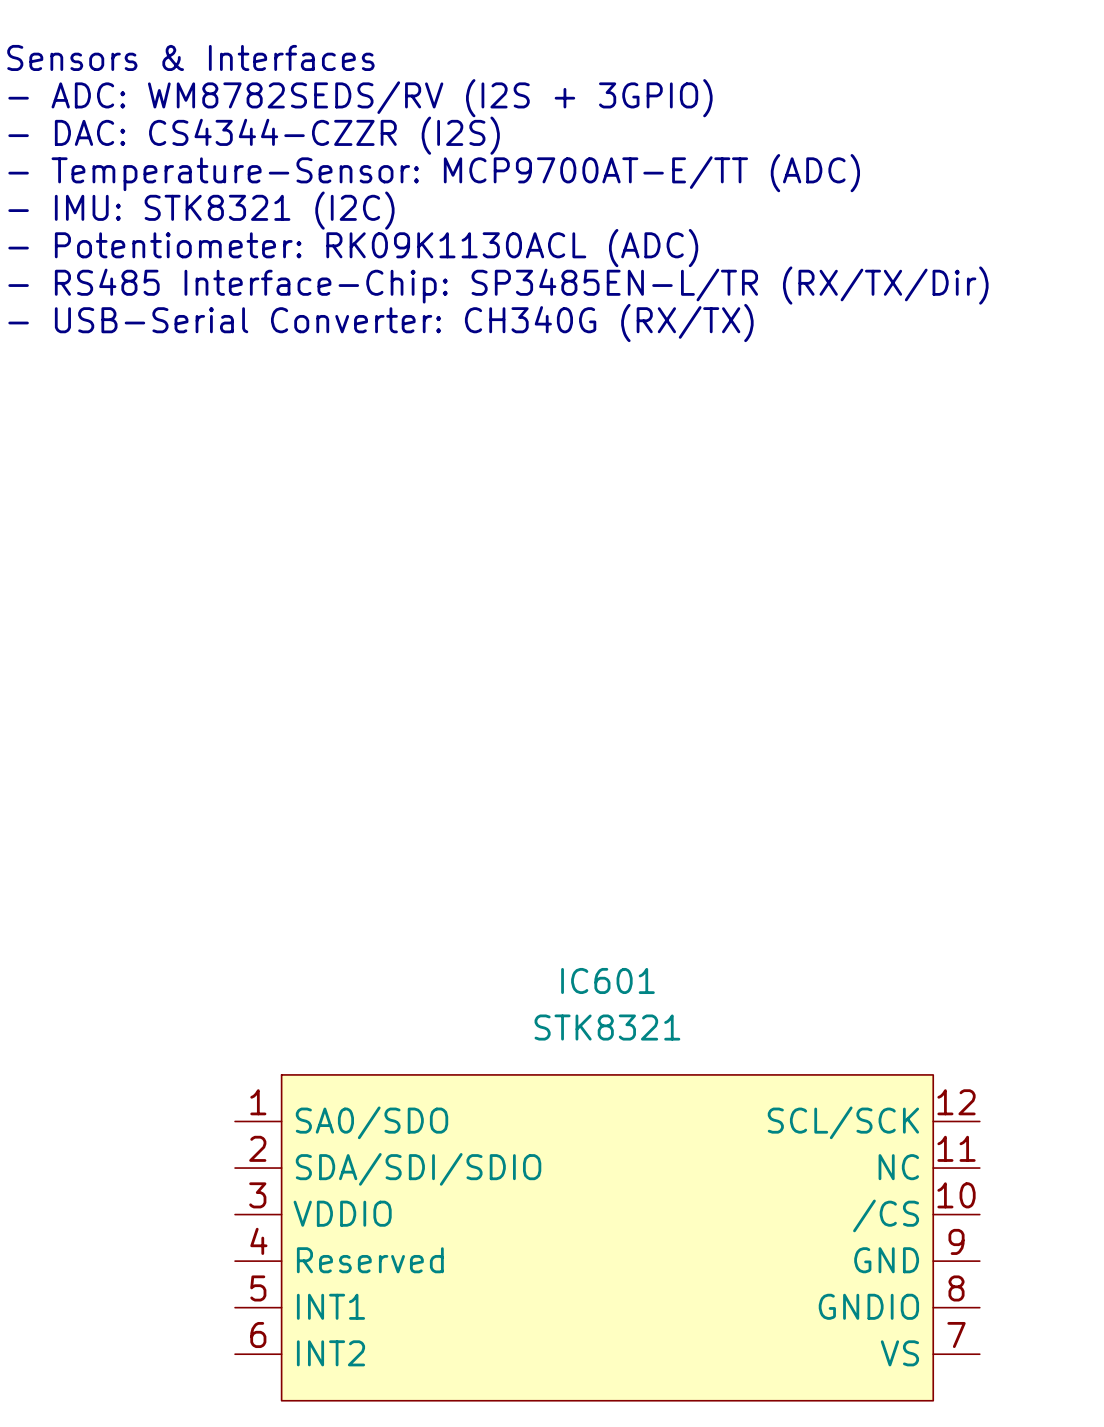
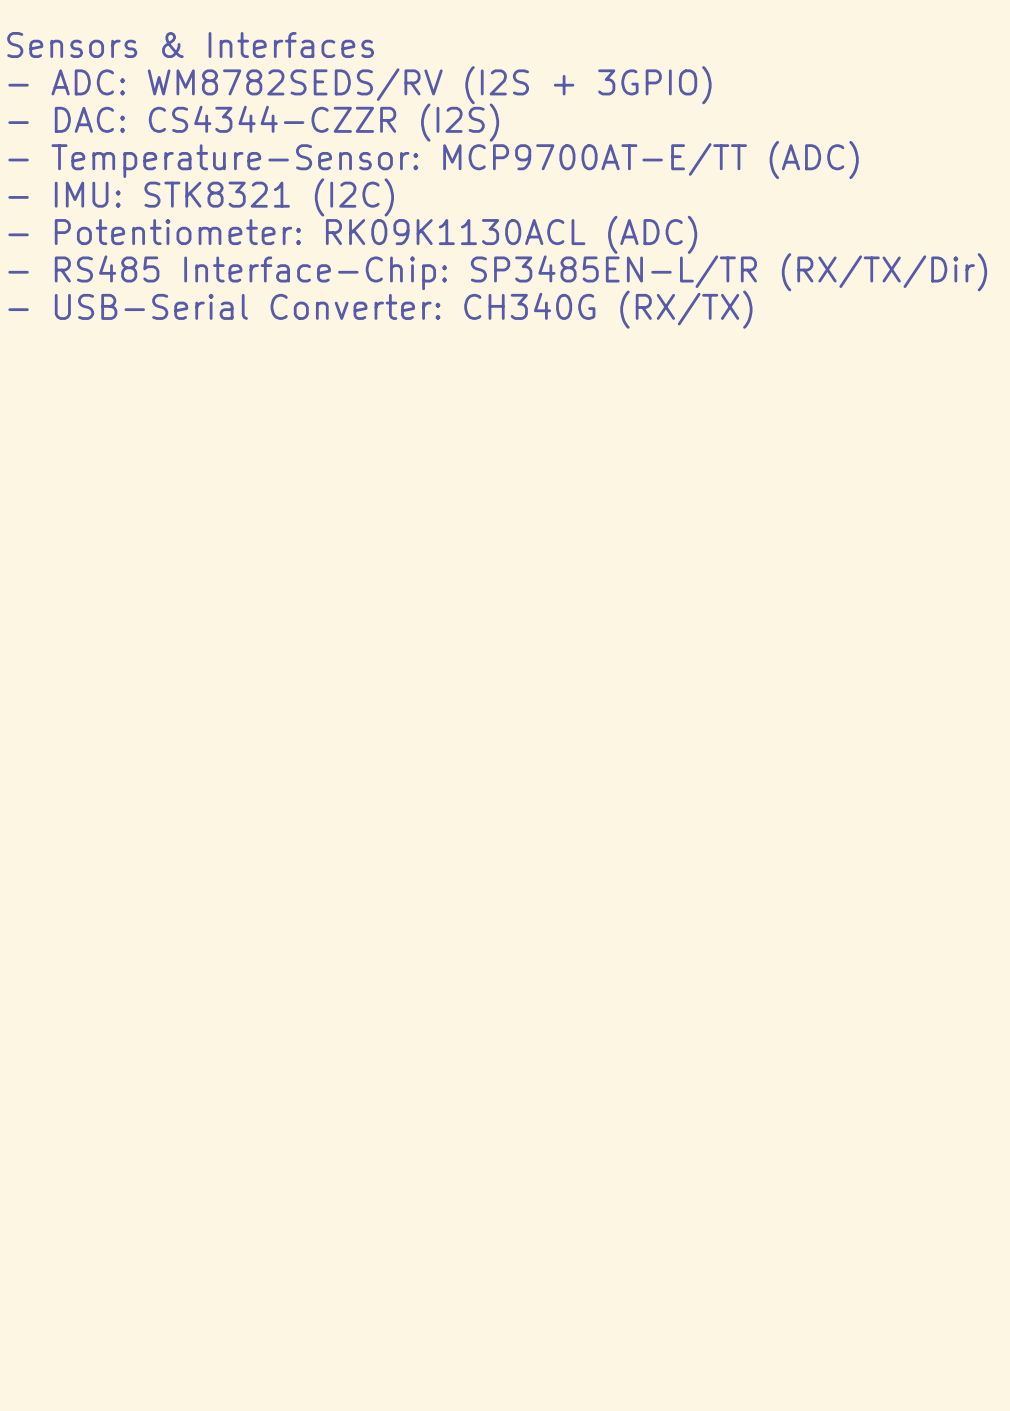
IC601: STK8321 (607, 1237) -> none

